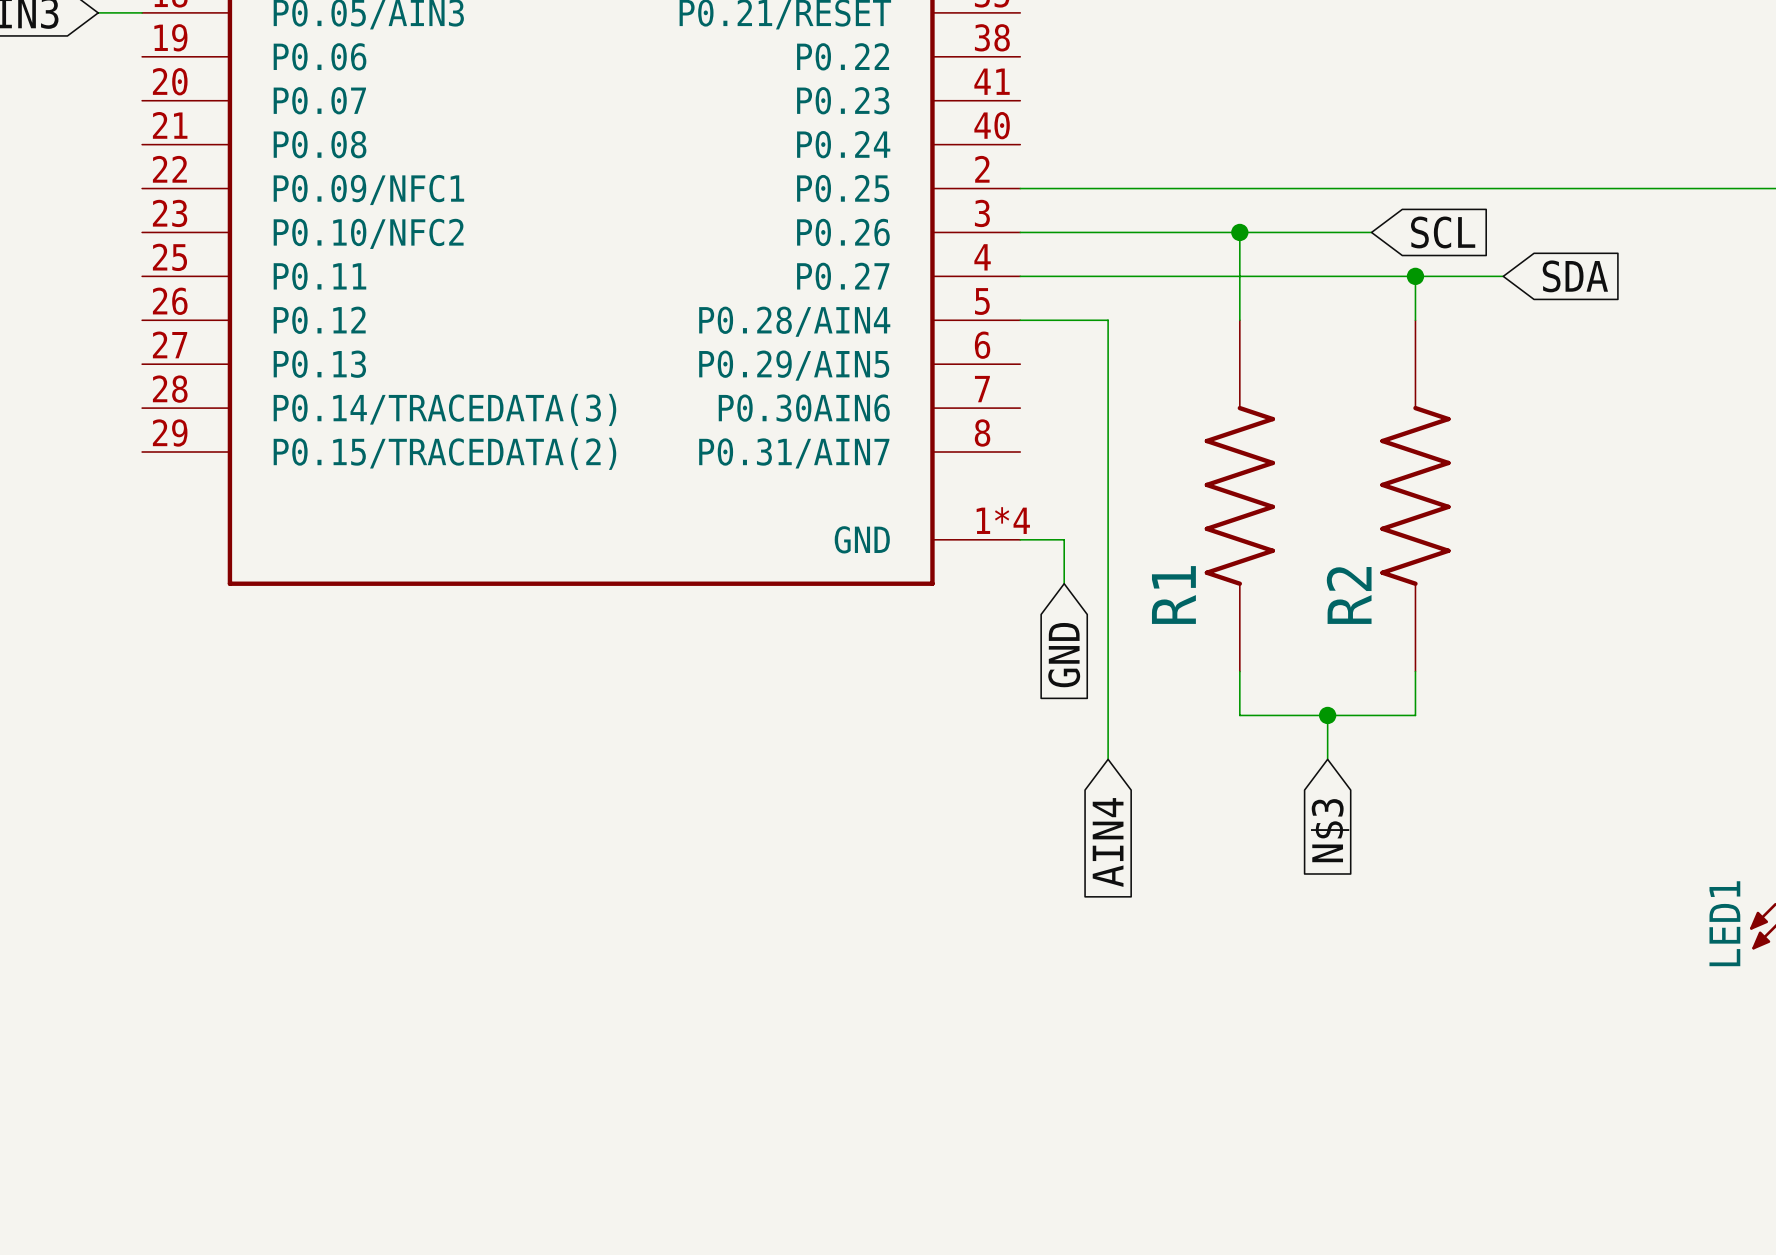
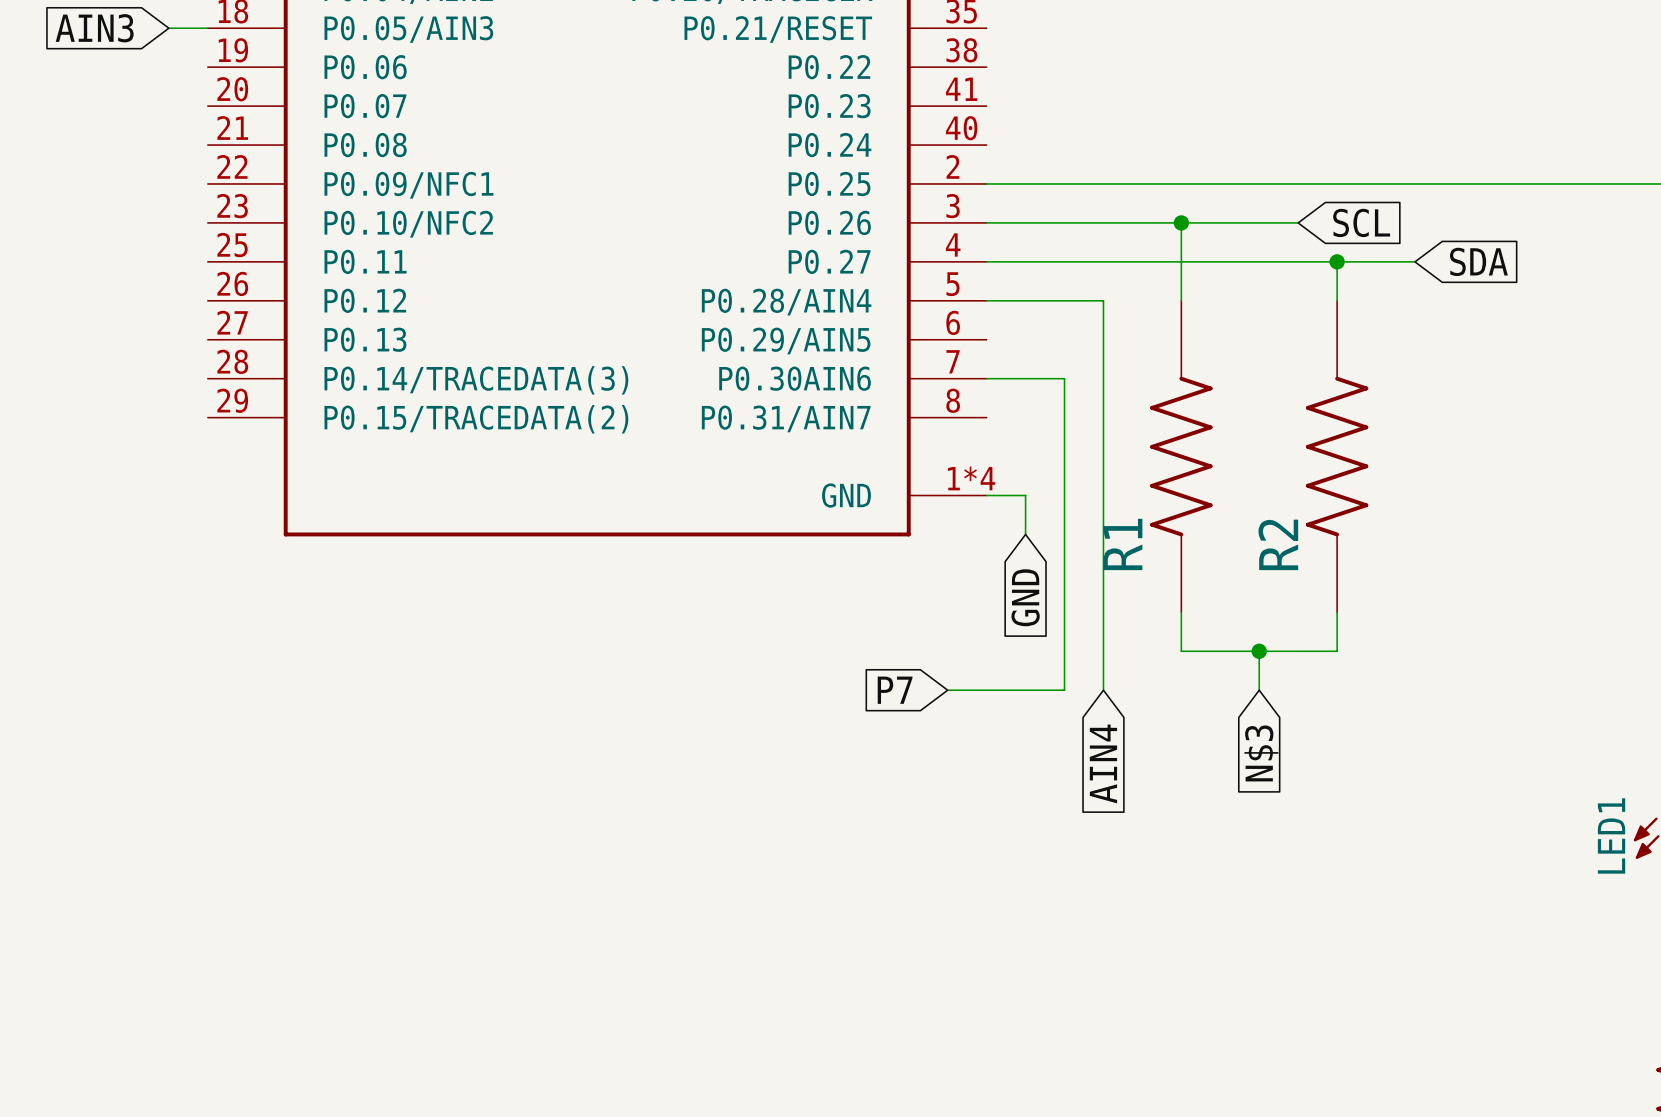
wire: (1108, 320) (1108, 408) -> (986, 378) (1064, 378)
wire: none -> (1064, 300) (1103, 300) (1103, 690)
global label: none -> P7 (895, 690)
wire: none -> (947, 690) (1064, 690)
global label position: AIN4 (1108, 842) -> AIN4 (1103, 763)

